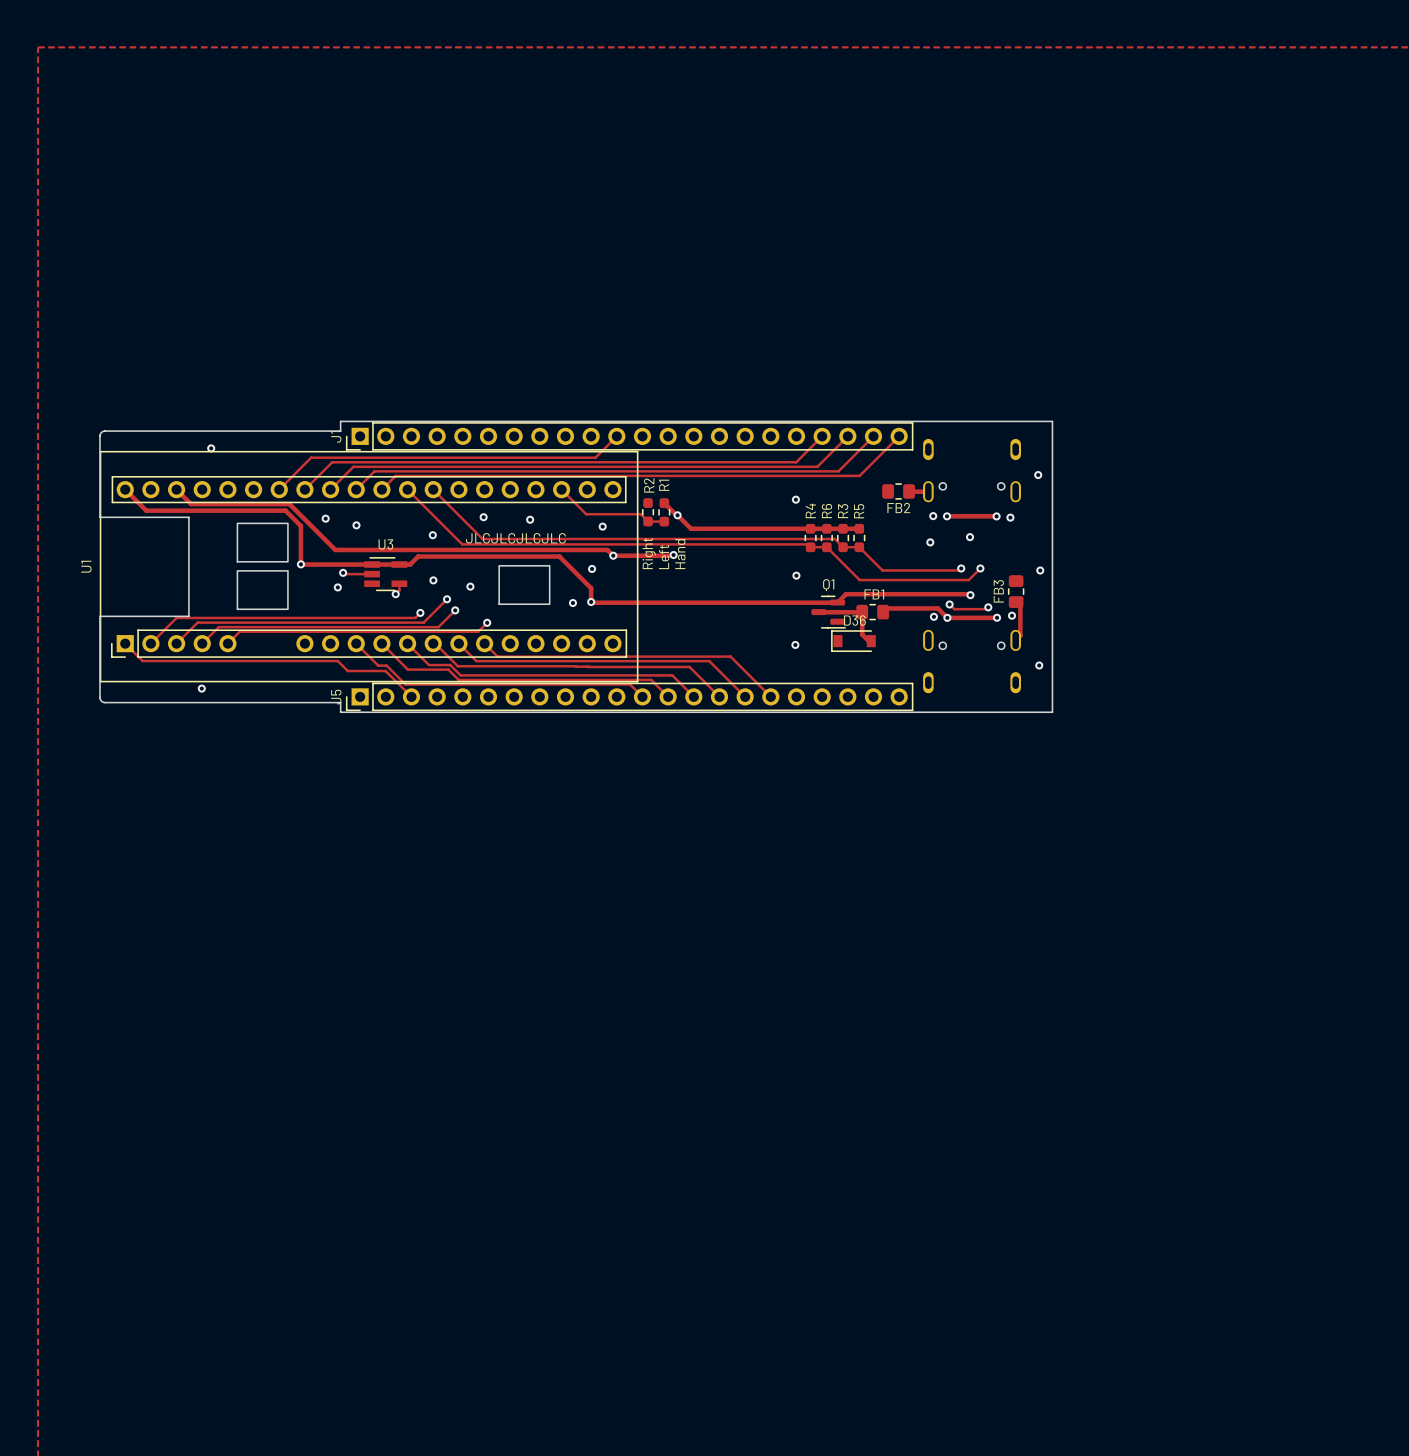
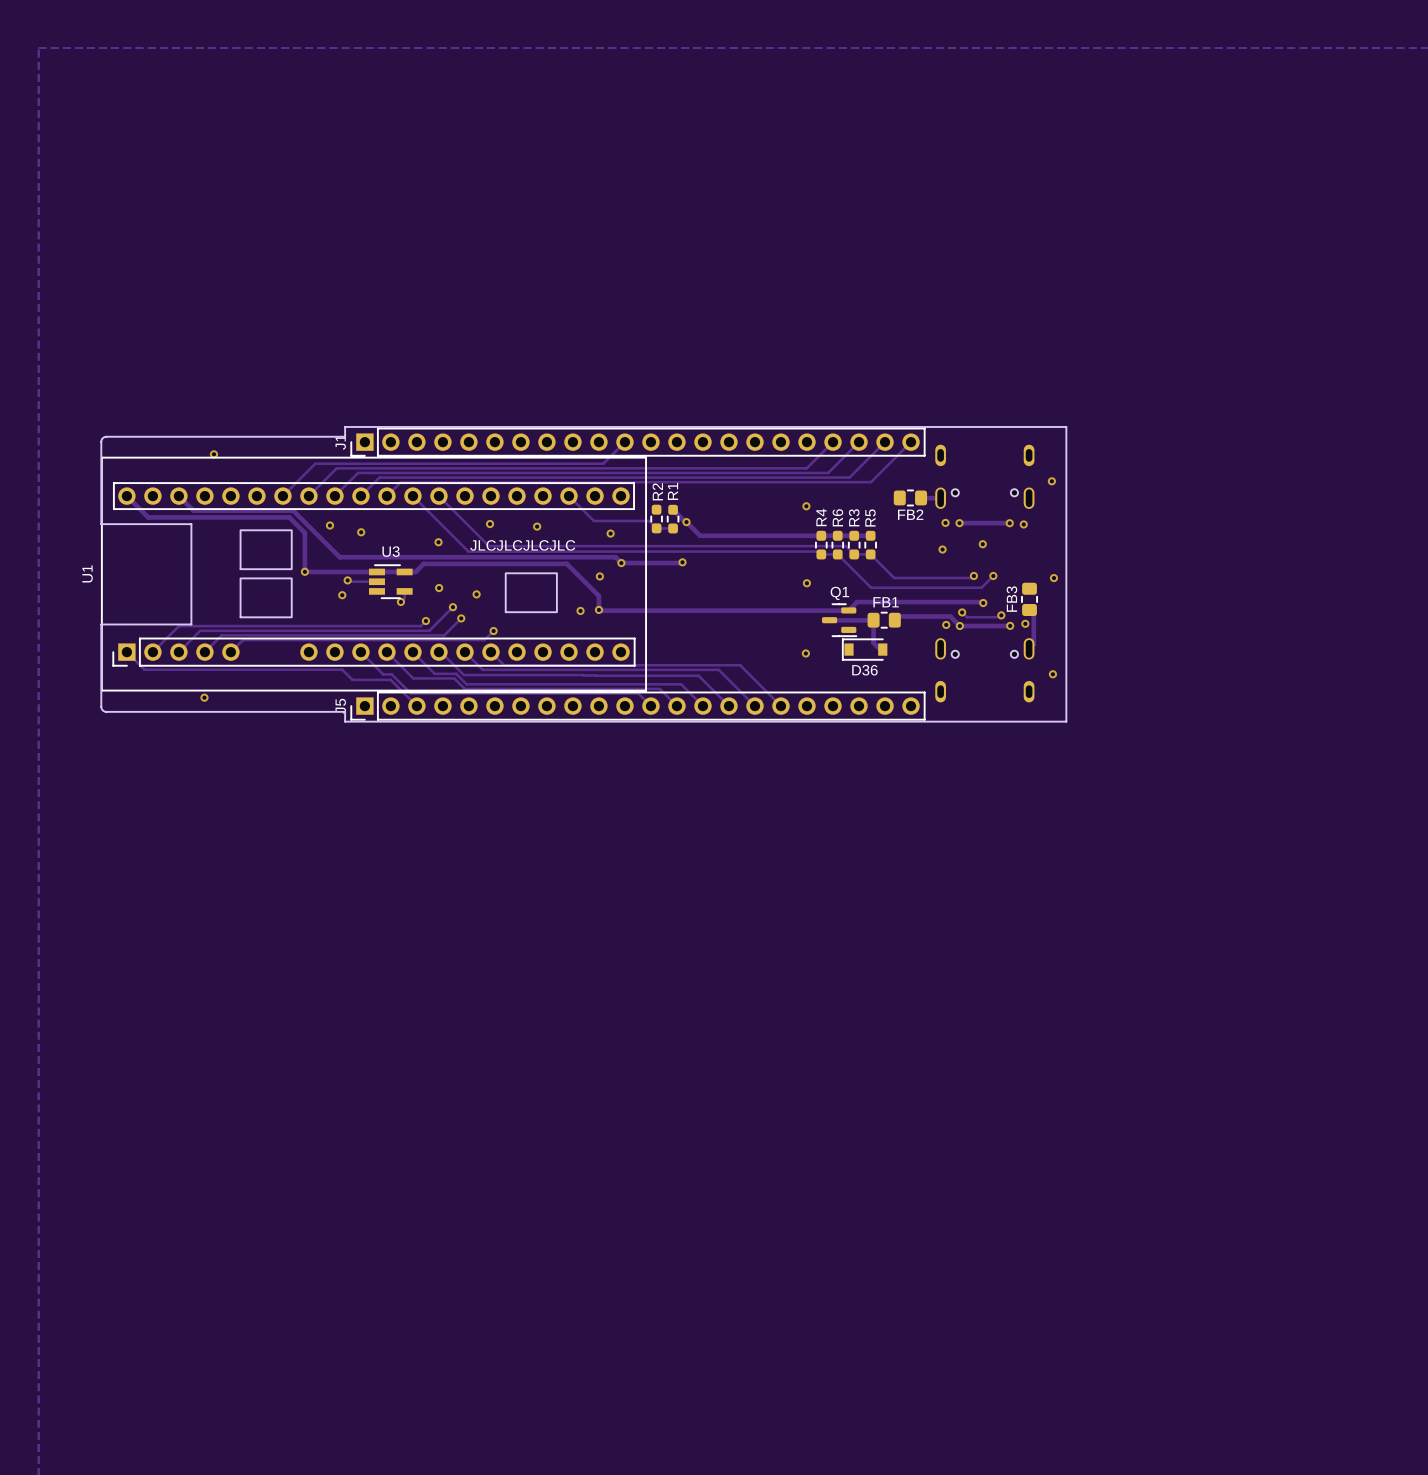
text: Right (649, 553) -> none
text: Hand (680, 554) -> none
text: Left (664, 557) -> none
D36 name position: D36 (854, 620) -> D36 (864, 670)

